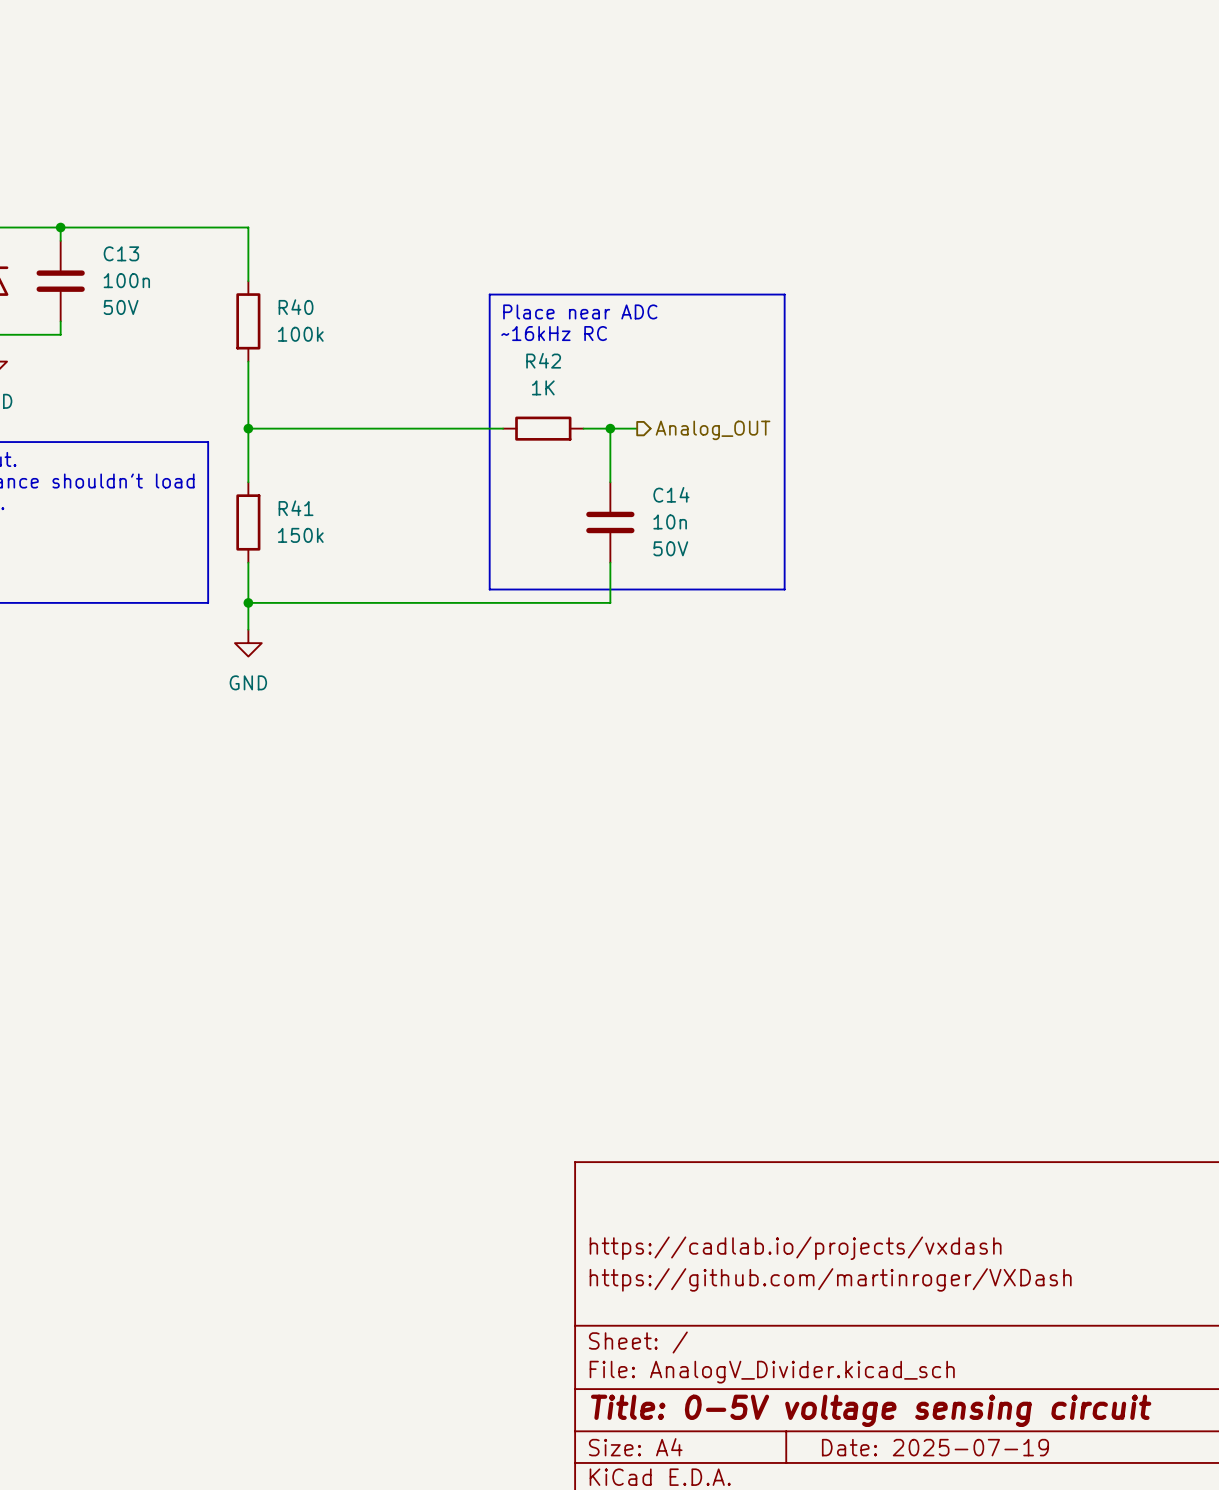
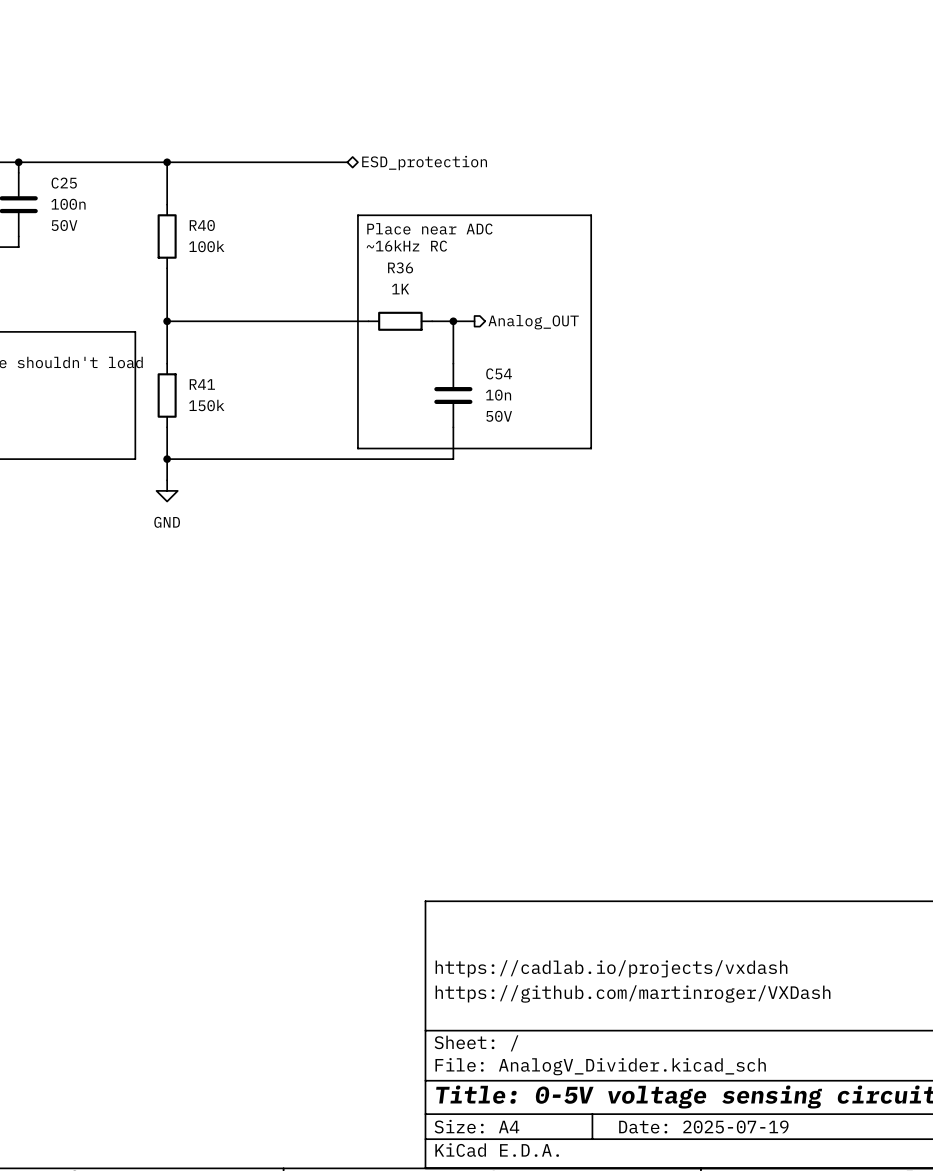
wire: none -> (167, 162) (347, 162)
junction: none -> (167, 162)
hierarchical label: none -> ESD_protection (424, 163)
C13 name: C13 (121, 253) -> C25 (64, 183)
R42 name: R42 (543, 360) -> R36 (400, 267)
C14 name: C14 (671, 494) -> C54 (499, 373)

